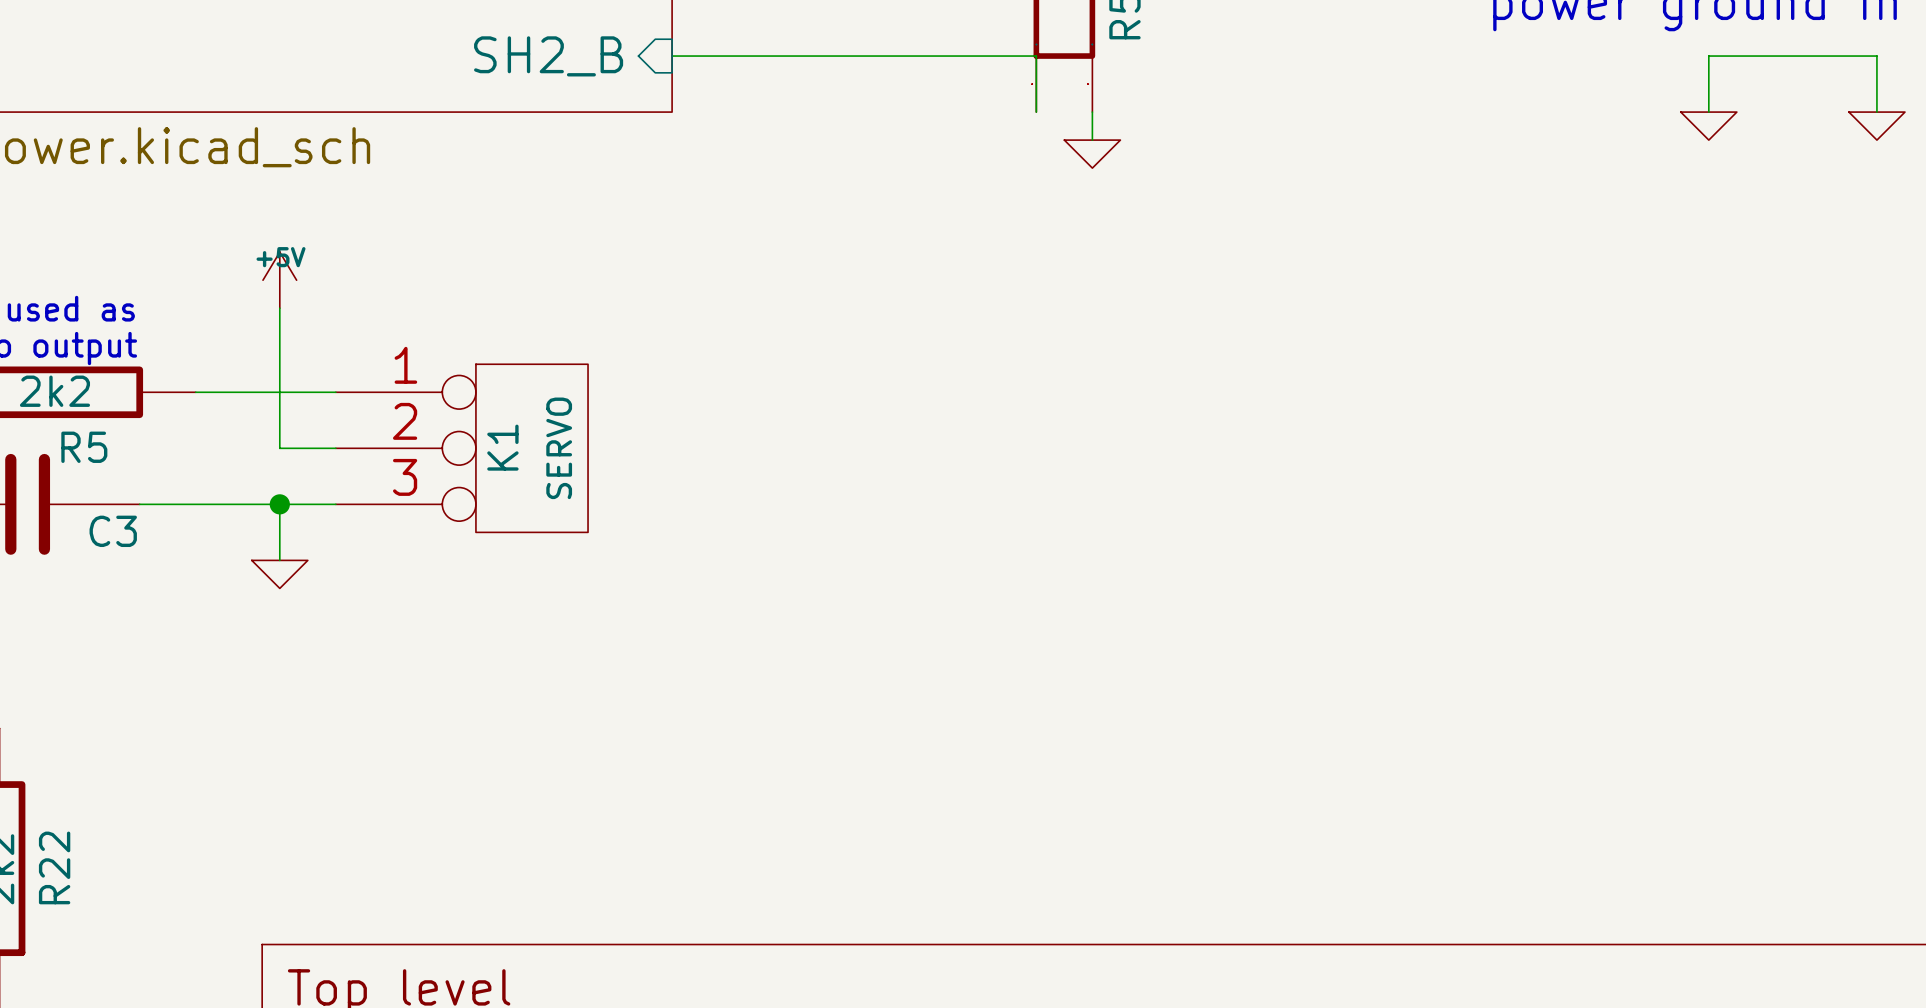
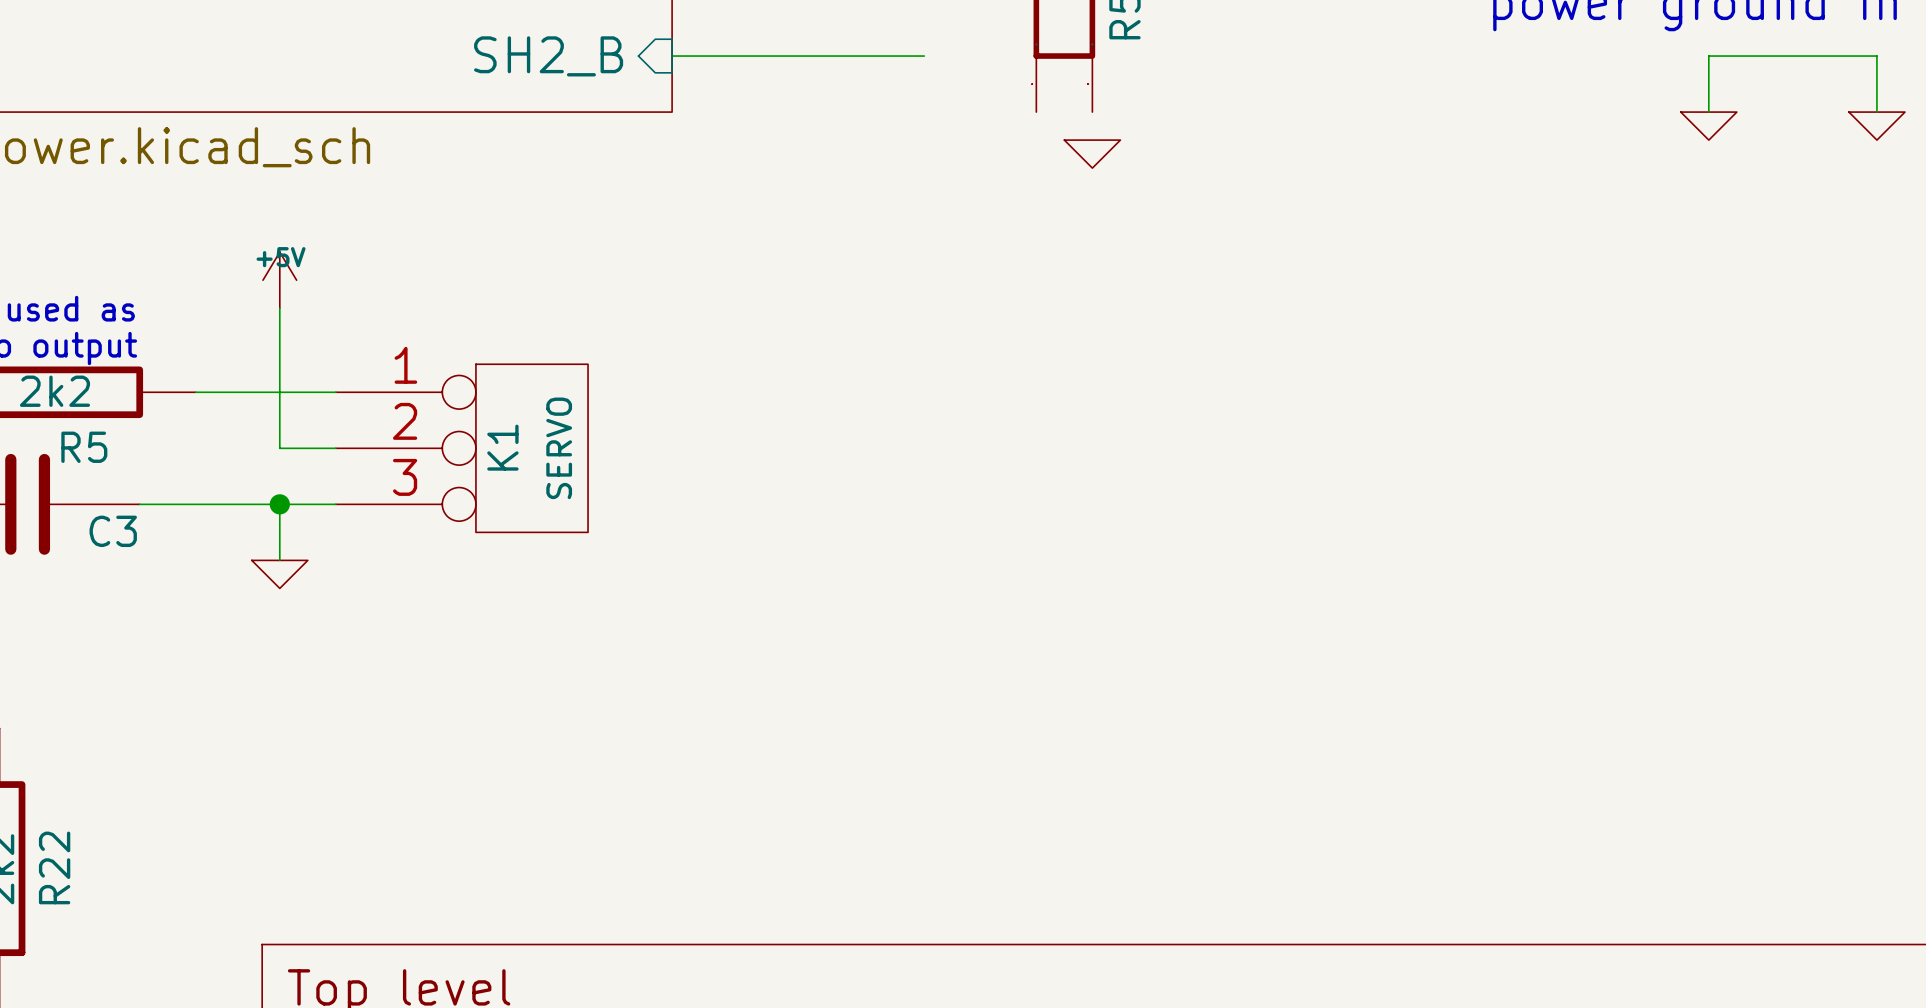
wire: (924, 56) (1036, 56) (1036, 112) -> none
wire: (1092, 112) (1092, 140) -> none

